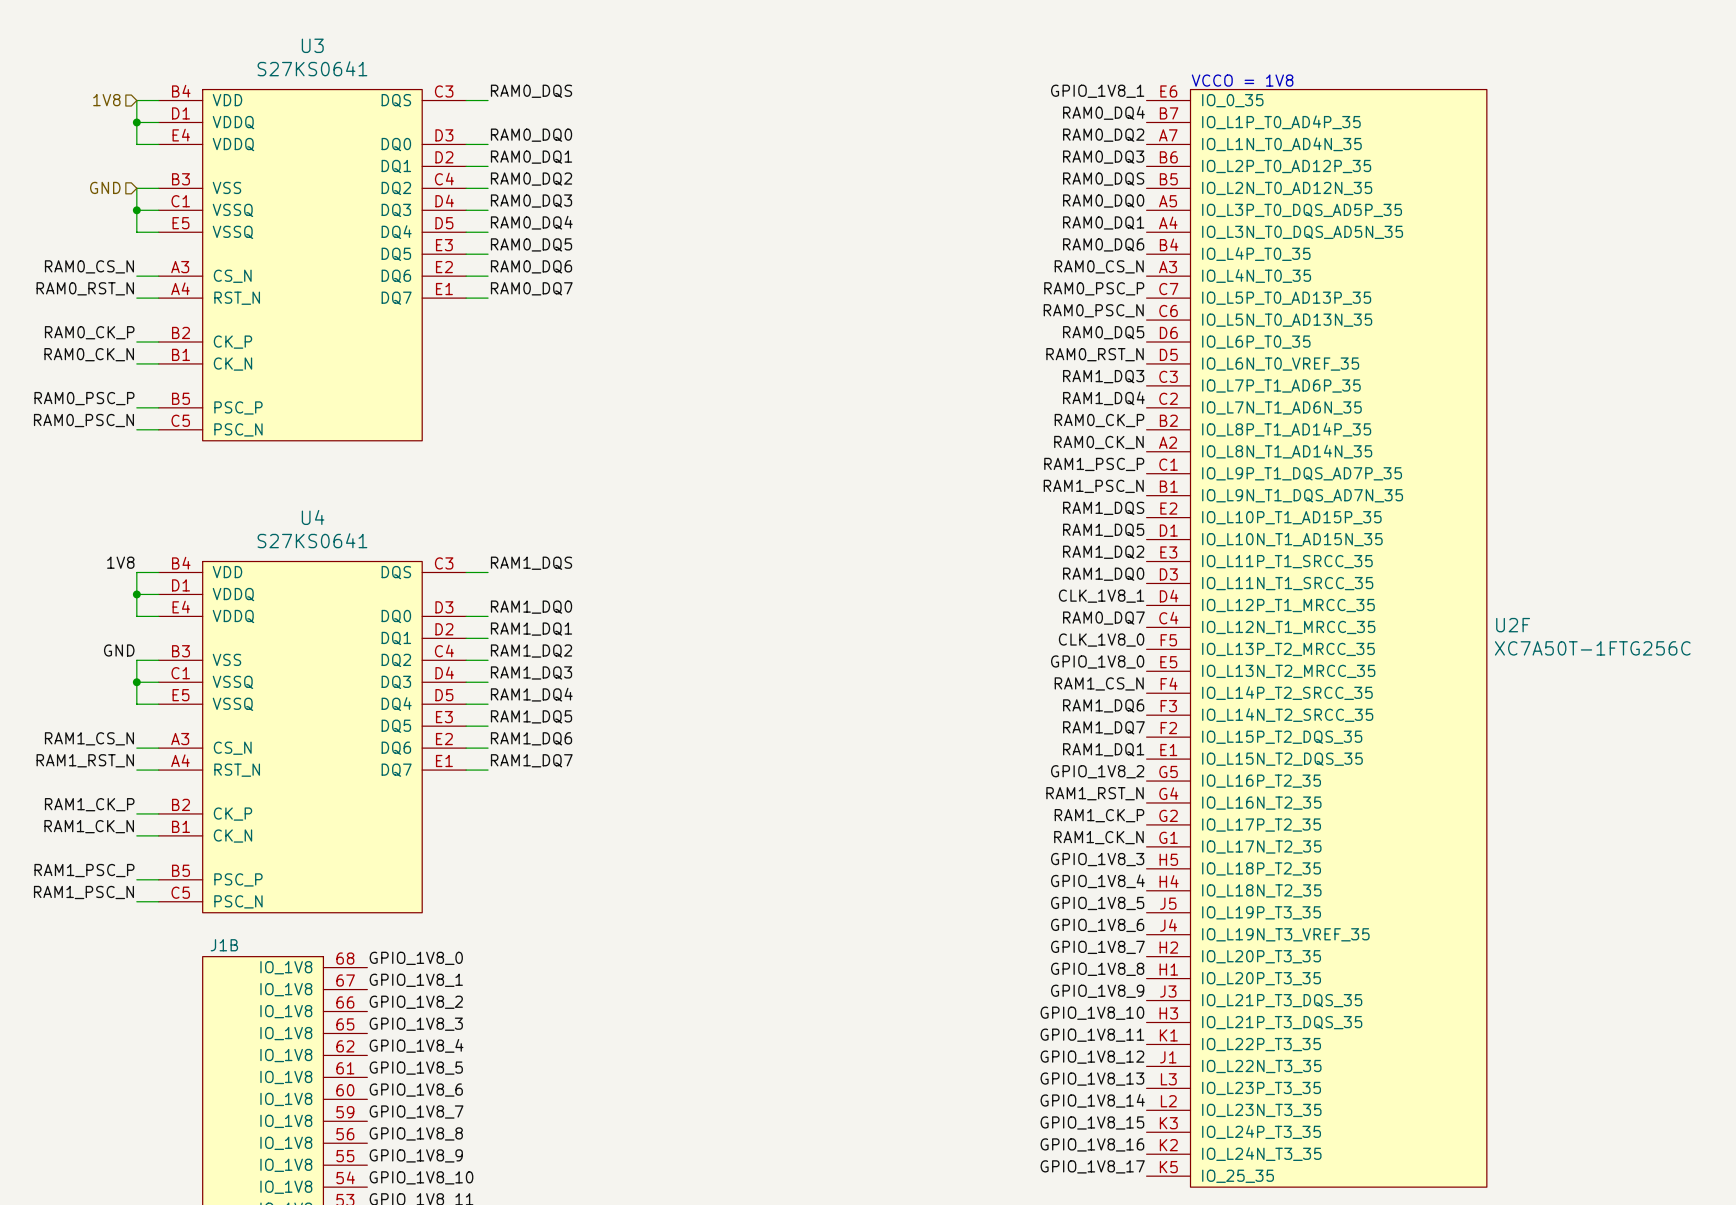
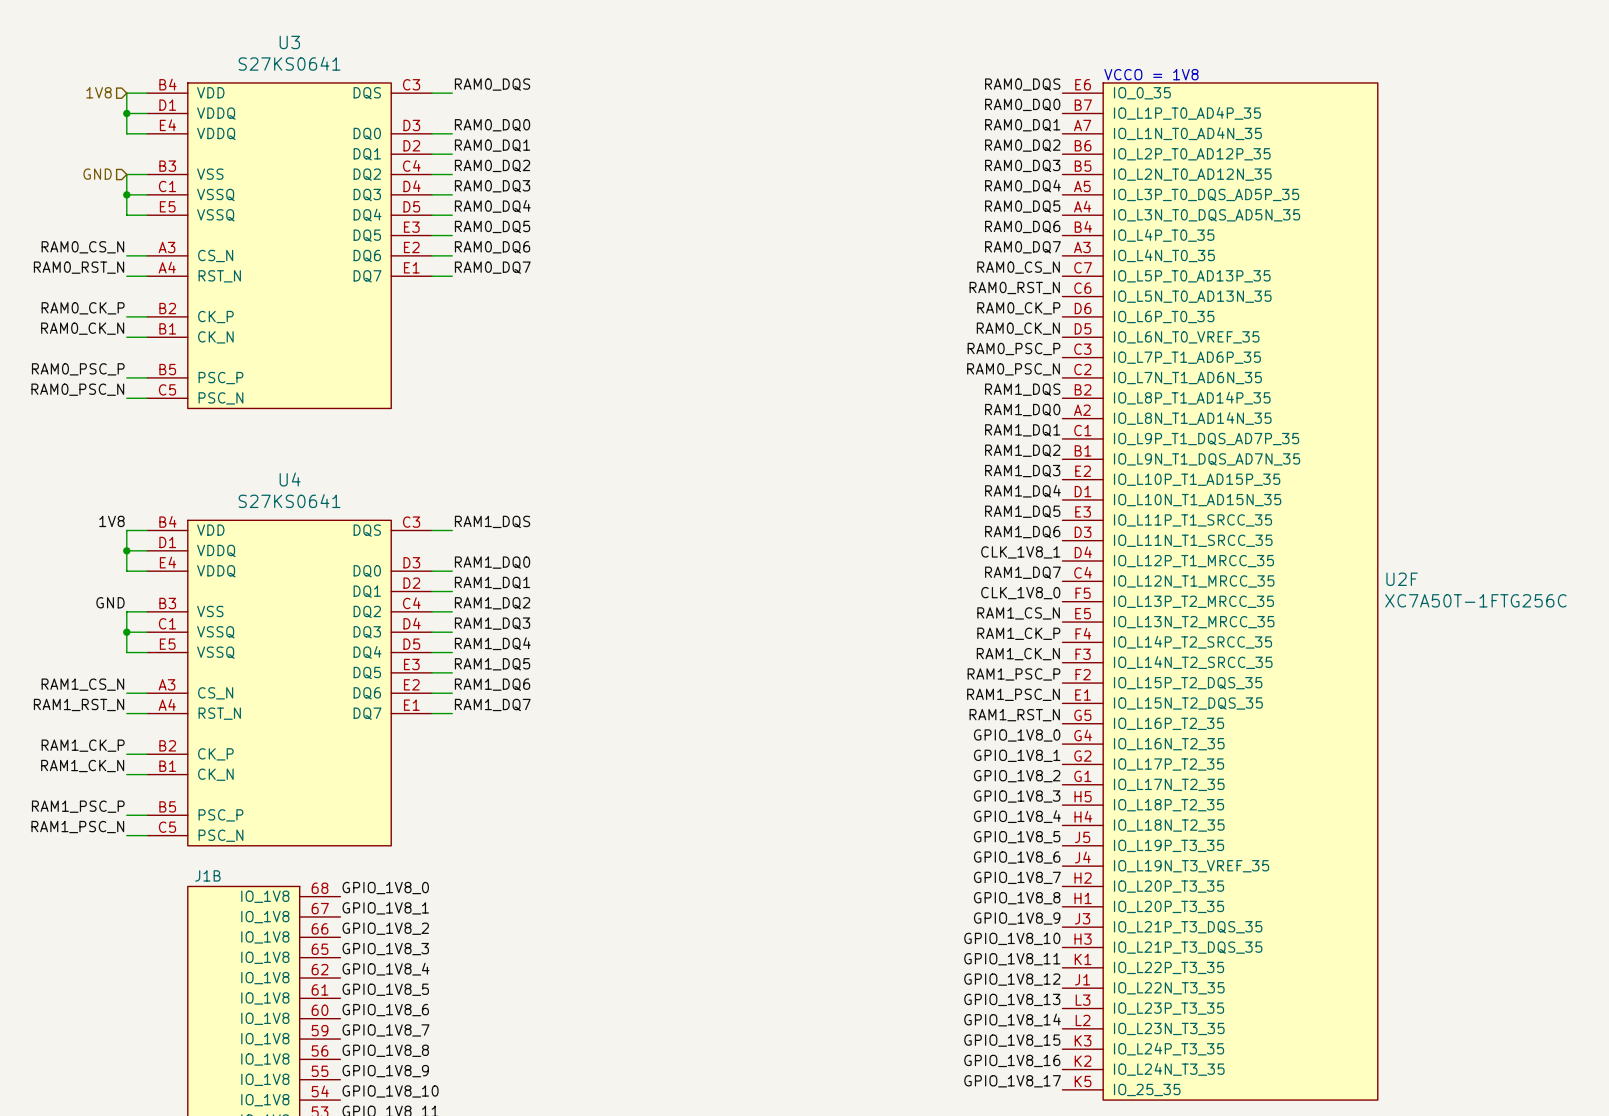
label: GPIO_1V8_1 (1097, 91) -> RAM0_DQS (1022, 84)
label: RAM0_DQ4 (1103, 112) -> RAM0_DQ0 (1022, 104)
label: RAM0_DQ2 (1103, 135) -> RAM0_DQ1 (1022, 125)
label: RAM0_DQ3 (1103, 157) -> RAM0_DQ2 (1022, 145)
label: RAM0_DQS (1103, 179) -> RAM0_DQ3 (1022, 165)
label: RAM0_DQ0 (1103, 201) -> RAM0_DQ4 (1022, 186)
label: RAM0_DQ1 (1103, 222) -> RAM0_DQ5 (1022, 206)
label: RAM0_CS_N (1099, 266) -> RAM0_DQ7 (1022, 247)
label: RAM0_PSC_P (1094, 288) -> RAM0_CS_N (1018, 267)
label: RAM0_PSC_N (1093, 310) -> RAM0_RST_N (1014, 287)
label: RAM0_DQ5 (1103, 332) -> RAM0_CK_P (1018, 308)
label: RAM0_RST_N (1095, 354) -> RAM0_CK_N (1018, 328)
label: RAM1_DQ3 (1103, 376) -> RAM0_PSC_P (1013, 349)
label: RAM1_DQ4 (1103, 398) -> RAM0_PSC_N (1013, 369)
label: RAM0_CK_P (1099, 420) -> RAM1_DQS (1022, 389)
label: RAM0_CK_N (1098, 442) -> RAM1_DQ0 (1022, 410)
label: RAM1_PSC_P (1094, 464) -> RAM1_DQ1 (1022, 430)
label: RAM1_PSC_N (1093, 486) -> RAM1_DQ2 (1022, 450)
label: RAM1_DQS (1103, 508) -> RAM1_DQ3 (1022, 471)
label: RAM1_DQ5 (1103, 530) -> RAM1_DQ4 (1022, 491)
label: RAM1_DQ2 (1103, 552) -> RAM1_DQ5 (1022, 511)
label: RAM1_DQ0 (1103, 574) -> RAM1_DQ6 (1022, 532)
label: RAM0_DQ7 (1103, 618) -> RAM1_DQ7 (1022, 572)
label: GPIO_1V8_0 (1097, 662) -> RAM1_CS_N (1018, 613)
label: RAM1_CS_N (1099, 683) -> RAM1_CK_P (1018, 633)
label: RAM1_DQ6 (1103, 705) -> RAM1_CK_N (1018, 654)
label: RAM1_DQ7 (1103, 727) -> RAM1_PSC_P (1013, 674)
label: RAM1_DQ1 (1103, 749) -> RAM1_PSC_N (1013, 694)
label: GPIO_1V8_2 (1097, 771) -> RAM1_RST_N (1014, 715)
label: RAM1_RST_N (1095, 793) -> GPIO_1V8_0 (1017, 735)
label: RAM1_CK_P (1099, 815) -> GPIO_1V8_1 (1017, 755)
label: RAM1_CK_N (1098, 837) -> GPIO_1V8_2 (1017, 776)

